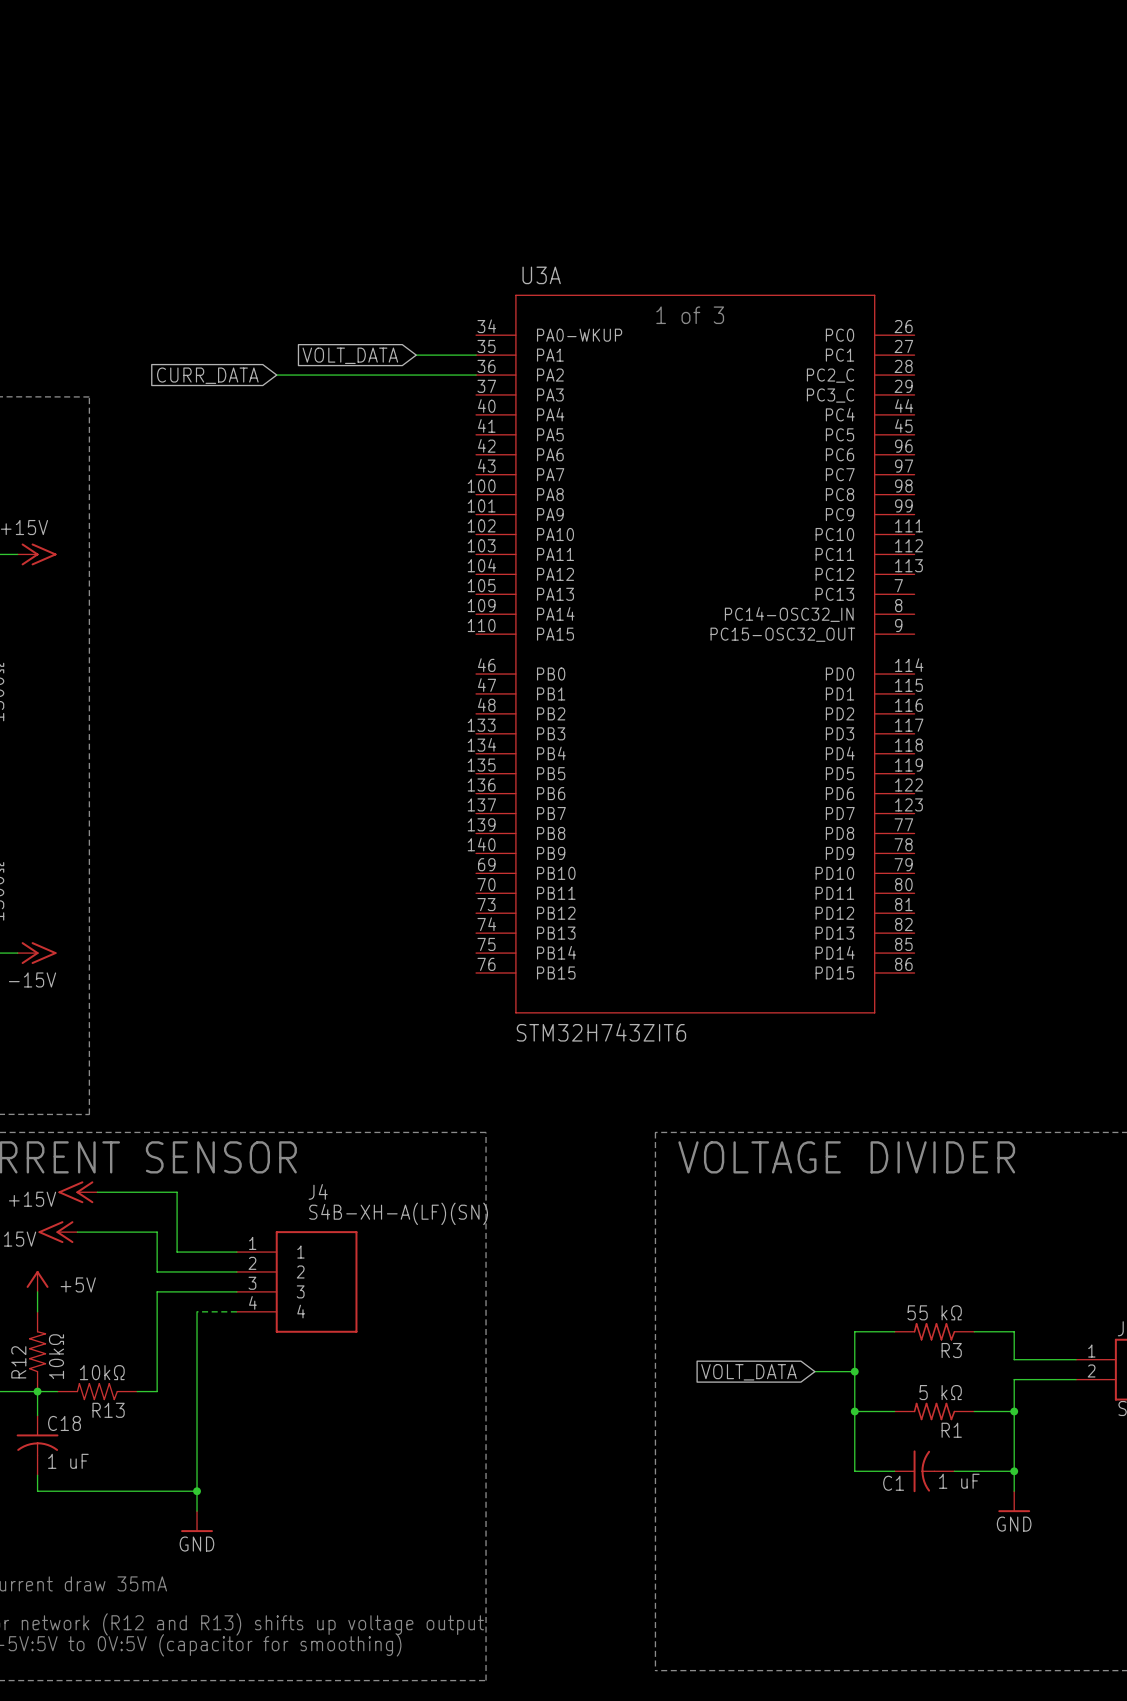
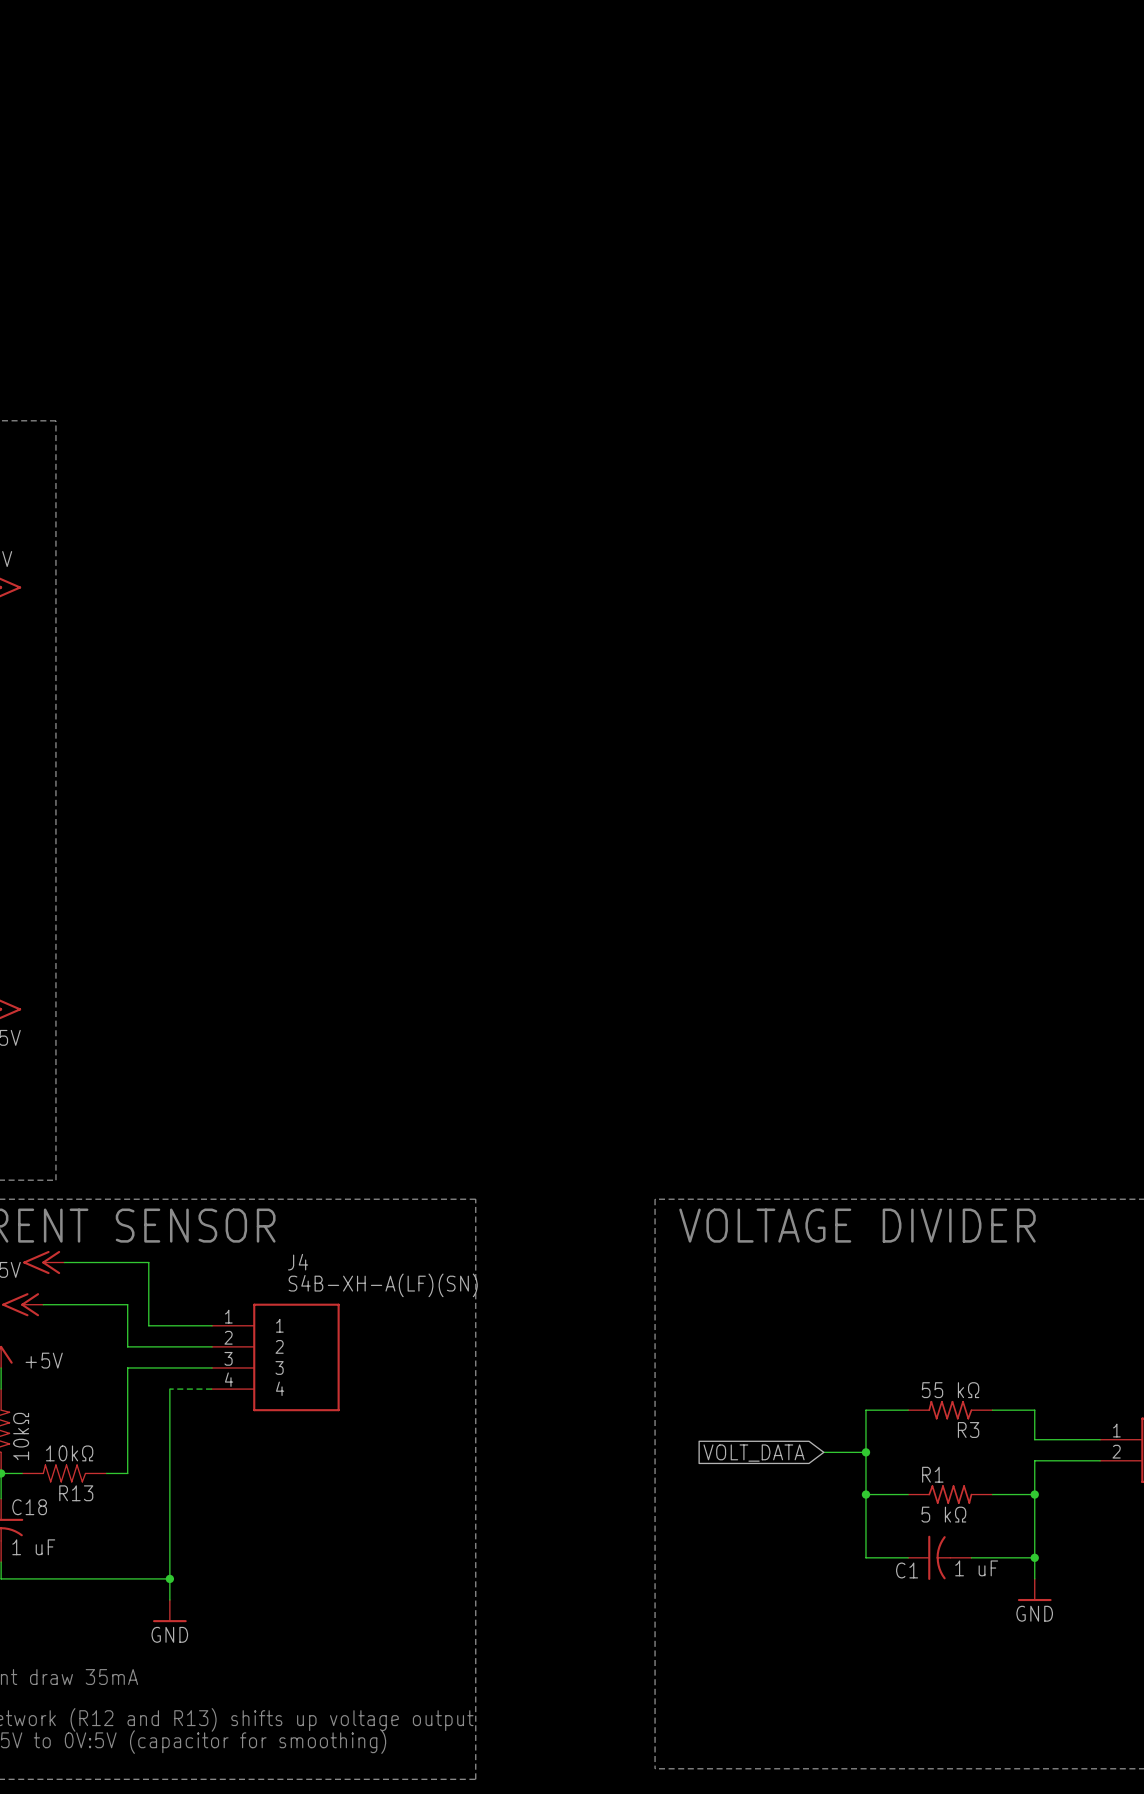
global label: VOLT_DATA (350, 355) -> none
wire: (416, 355) (476, 355) -> none
global label: CURR_DATA (207, 375) -> none
wire: (276, 375) (476, 375) -> none
U3A: STM32H743ZIT6 (695, 654) -> none
R1 rotation: 0° (934, 1411) -> 180° (950, 1494)

